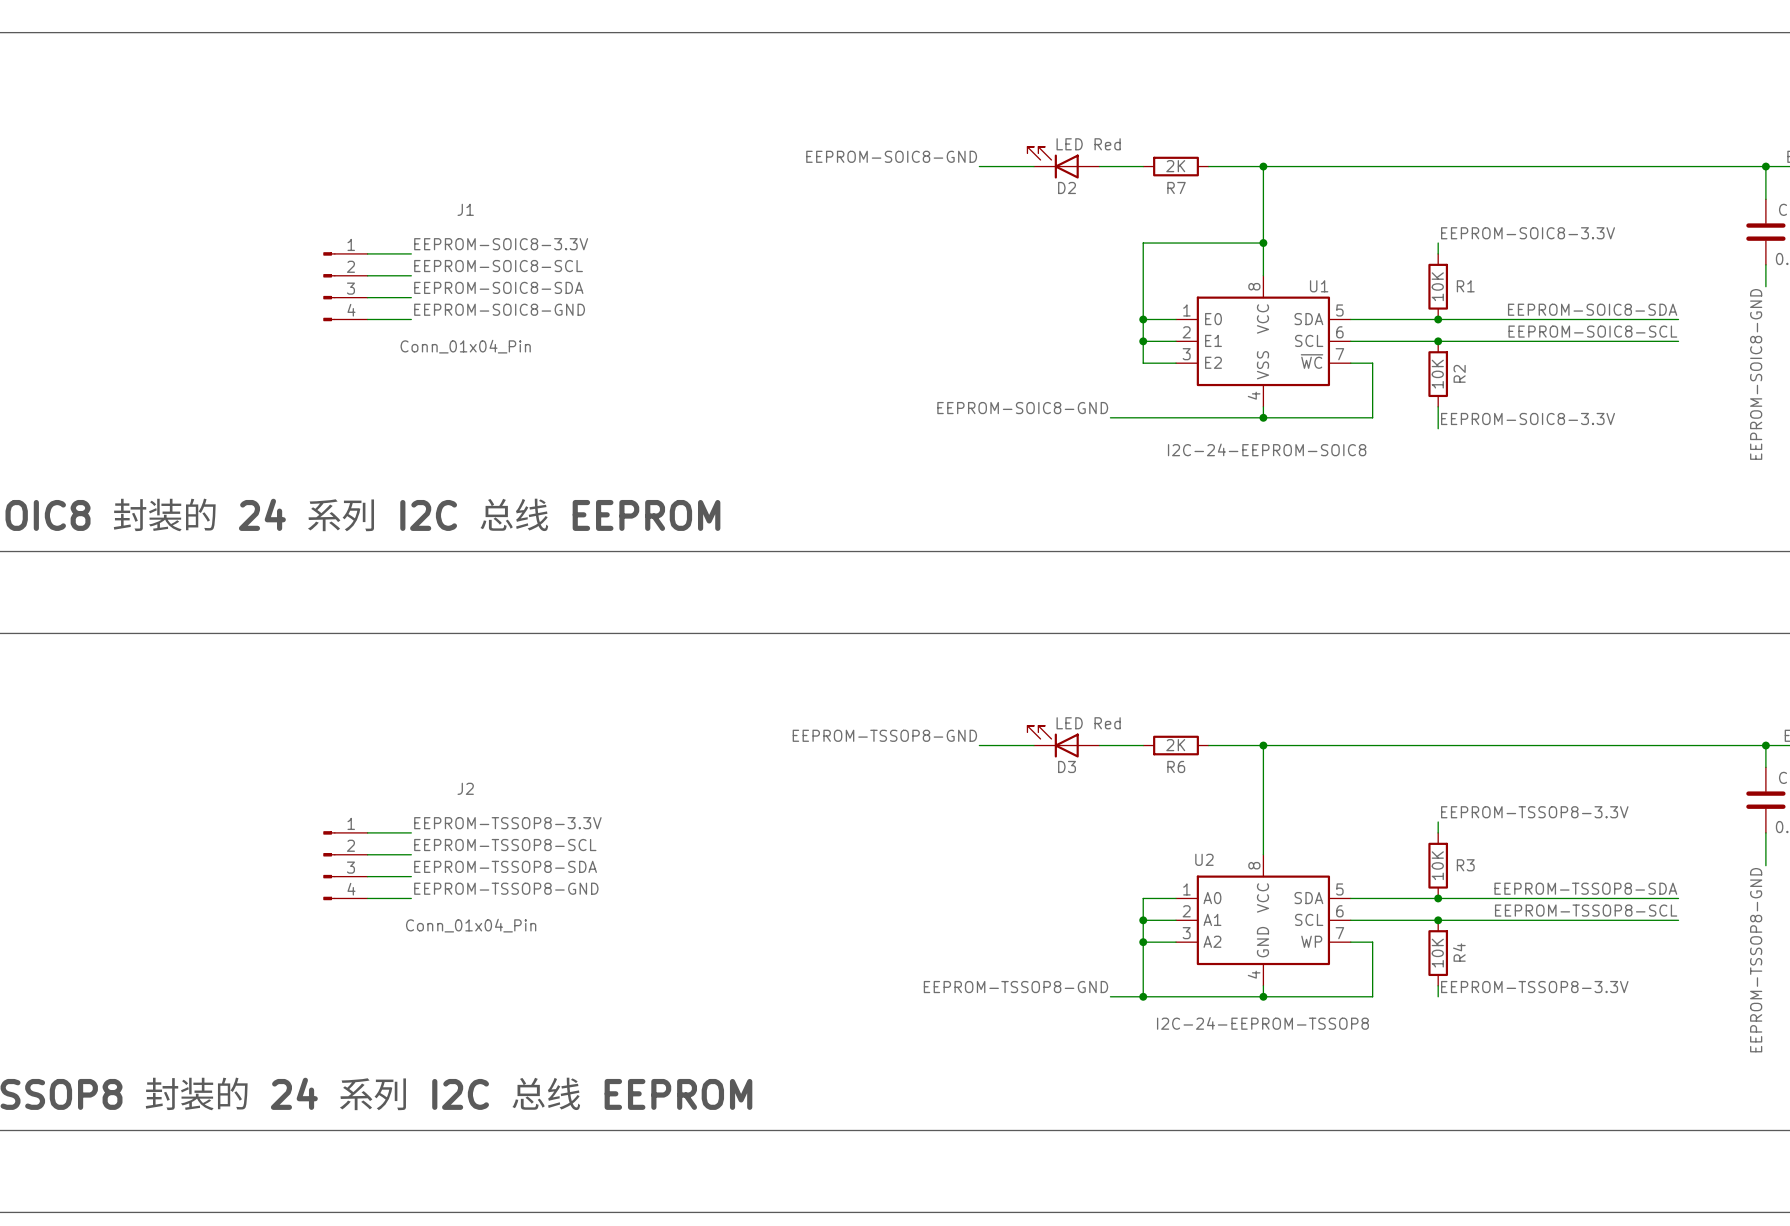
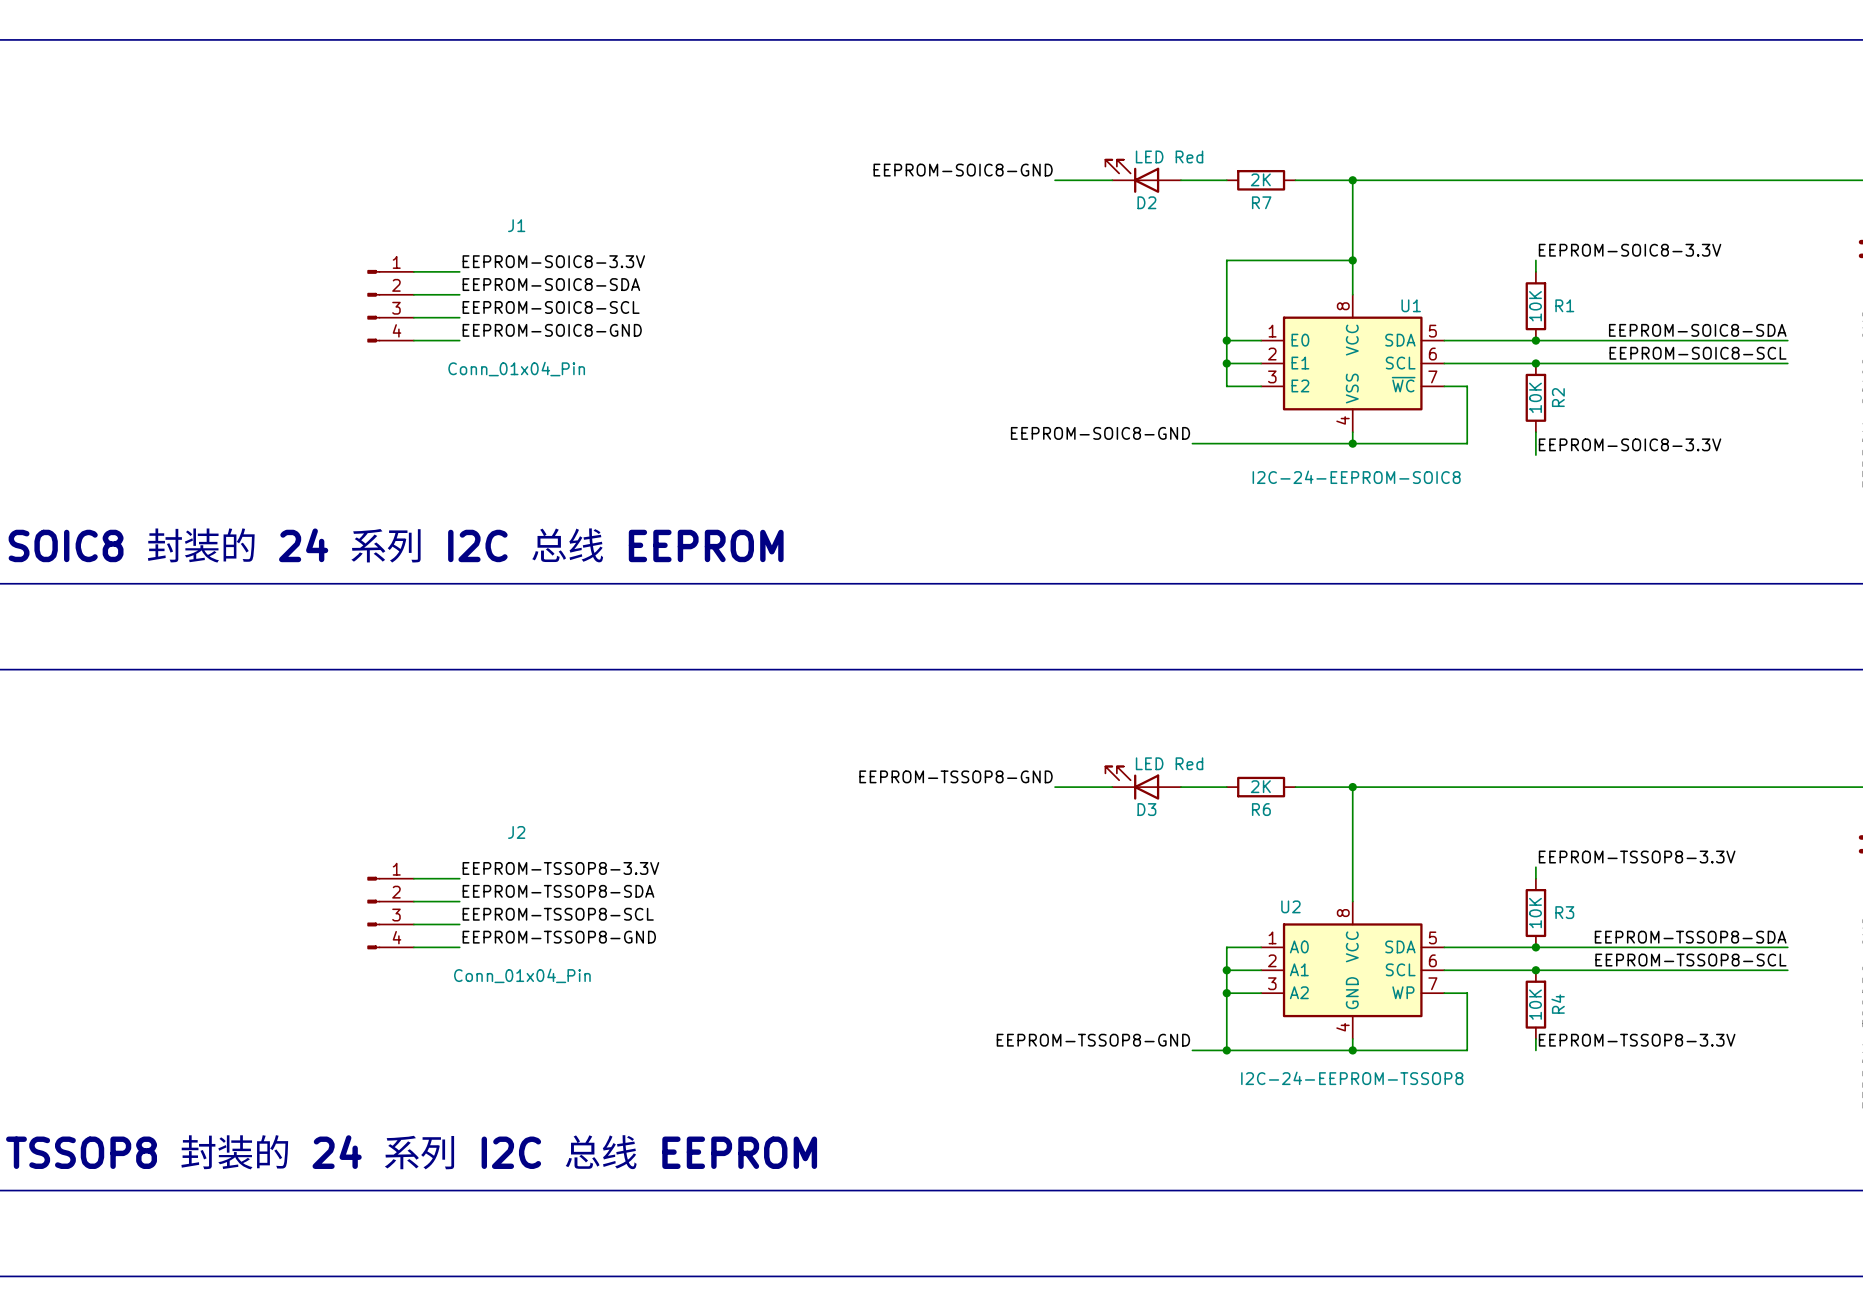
label: EEPROM-SOIC8-SCL (498, 266) -> EEPROM-SOIC8-SDA (551, 284)
label: EEPROM-SOIC8-SDA (498, 287) -> EEPROM-SOIC8-SCL (551, 307)
label: EEPROM-TSSOP8-SCL (505, 845) -> EEPROM-TSSOP8-SDA (558, 891)
label: EEPROM-TSSOP8-SDA (505, 866) -> EEPROM-TSSOP8-SCL (558, 914)

